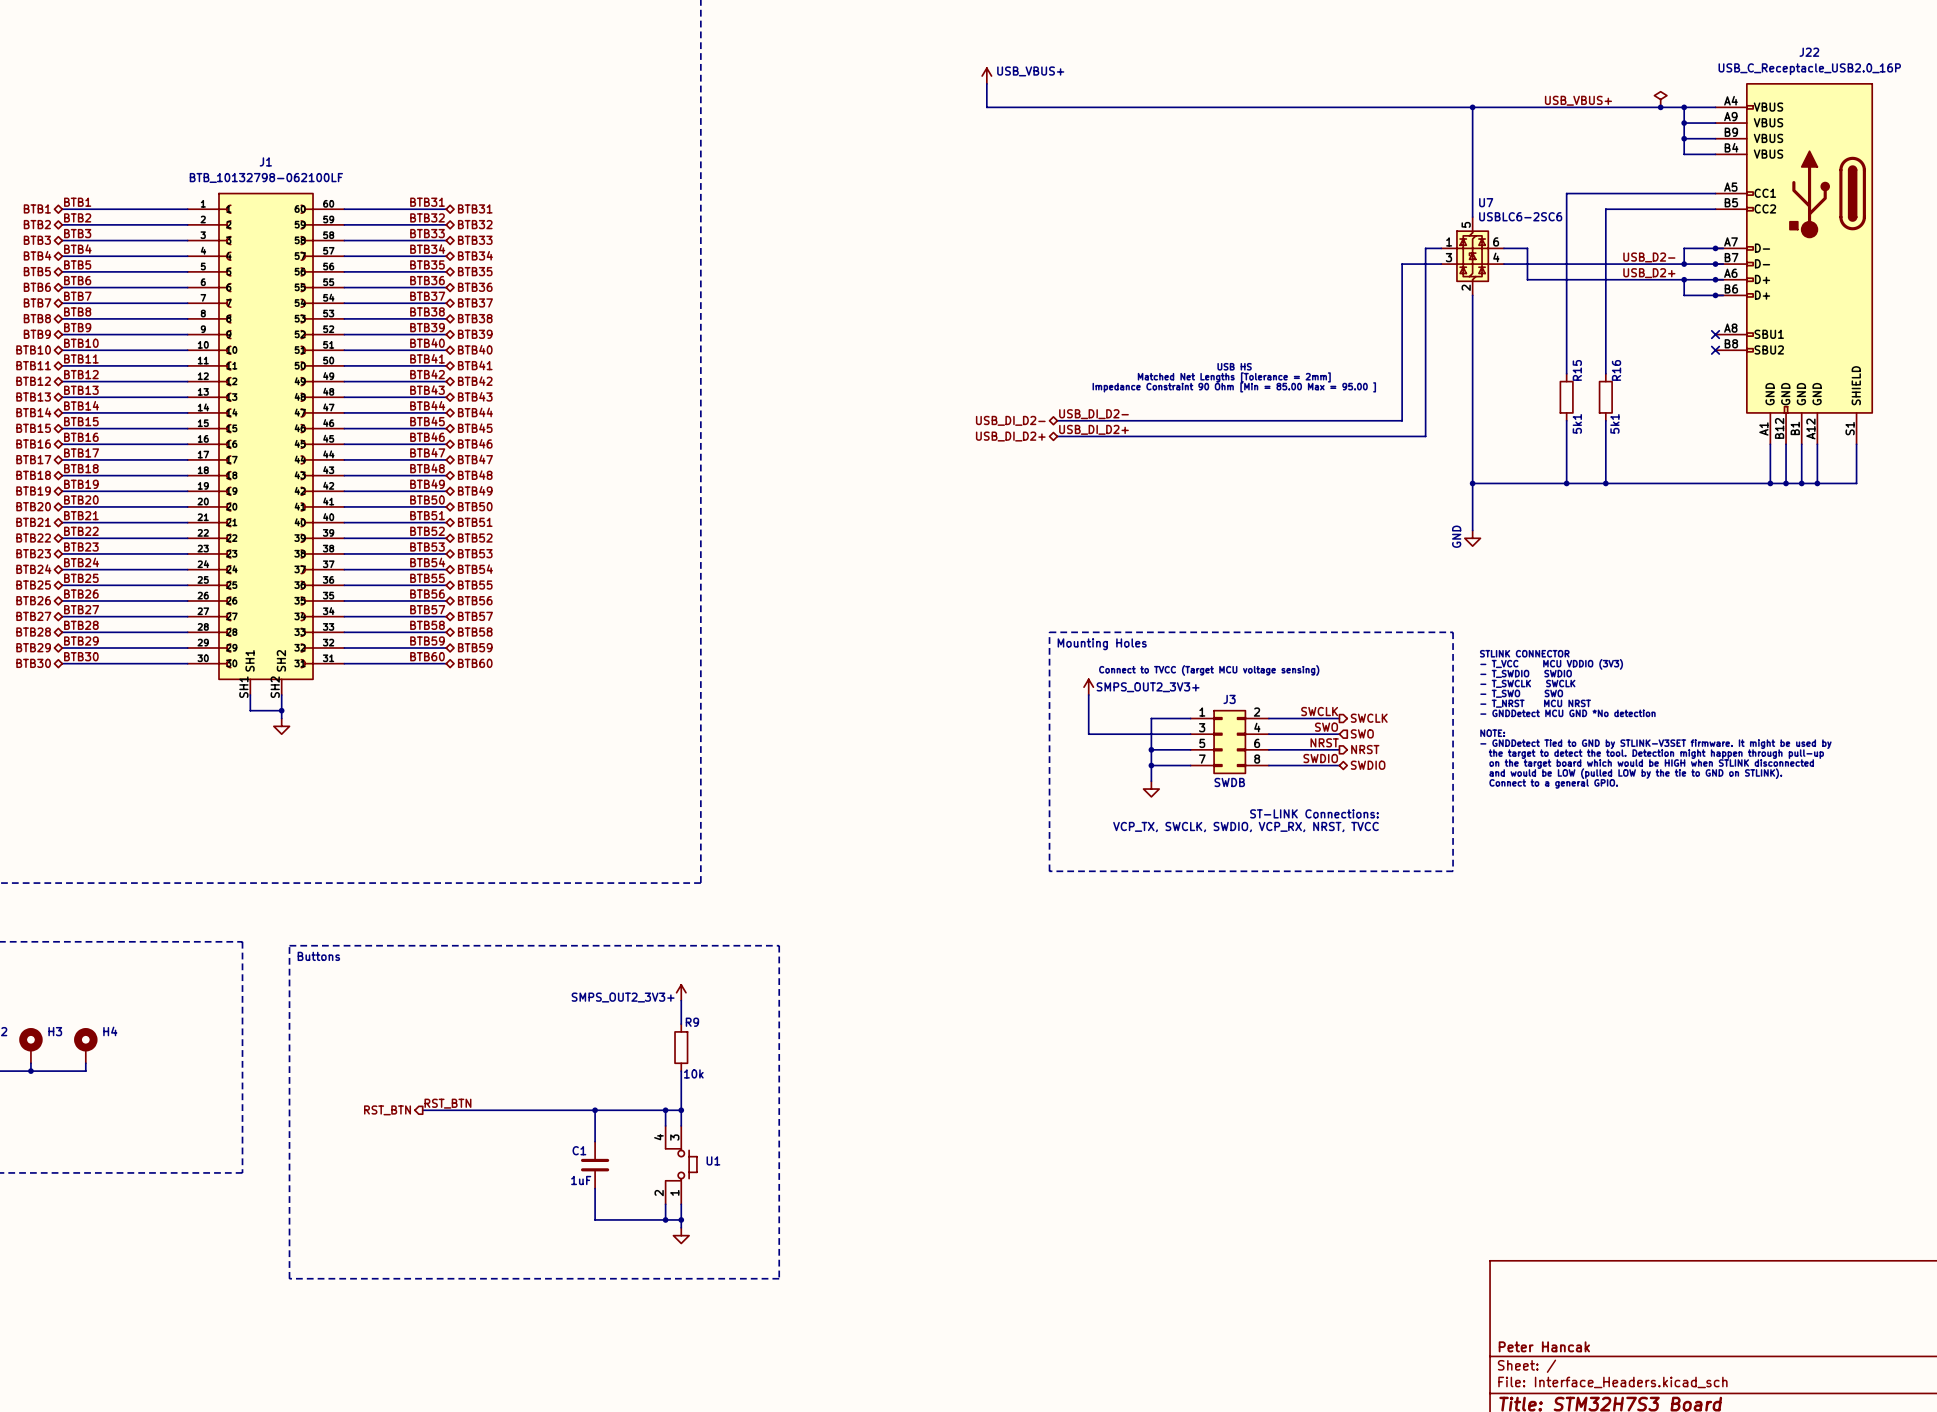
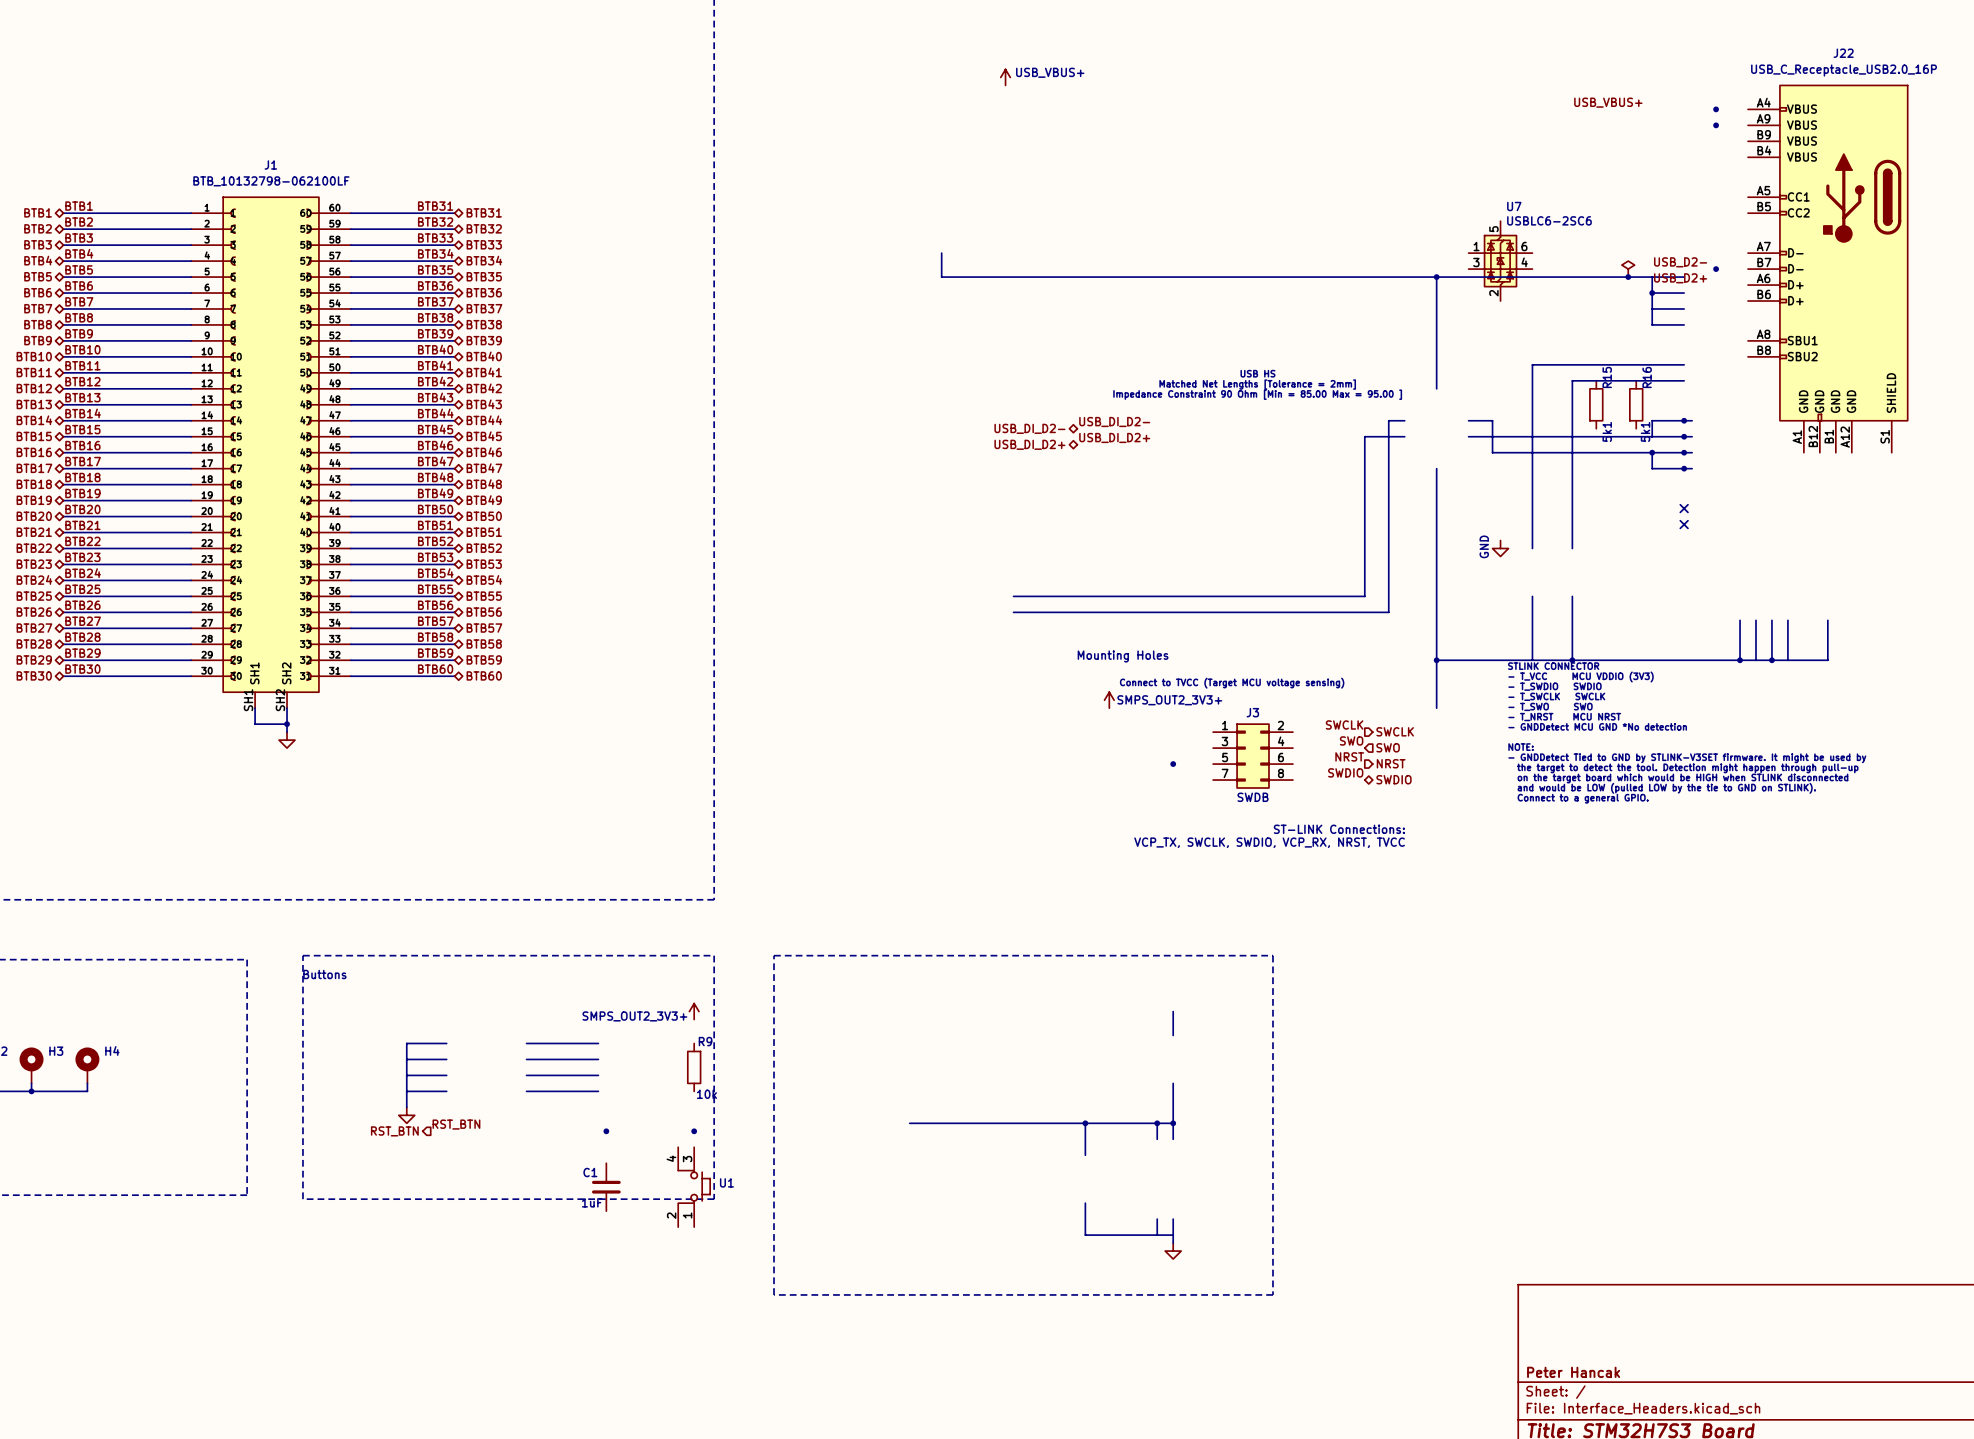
wire: (986, 83) (986, 107) (1715, 107) -> none
power symbol: (1660, 99) -> none
wire: (1472, 107) (1472, 217) -> none
junction: (1472, 107) -> none
junction: (1660, 107) -> none
wire: (1684, 107) (1684, 154) (1715, 154) -> none
wire: (1684, 123) (1715, 123) -> none
wire: (1684, 138) (1715, 138) -> none
junction: (1684, 138) -> none
wire: (1715, 193) (1566, 193) (1566, 373) -> none
wire: (1715, 209) (1605, 209) (1605, 373) -> none
wire: none -> (941, 253) (941, 277) (1684, 277)
wire: (1441, 248) (1425, 248) (1425, 436) (1057, 436) -> none
wire: (1503, 248) (1527, 248) (1527, 279) (1723, 279) -> none
junction: (1715, 248) -> none
wire: (1723, 248) (1684, 248) (1684, 264) -> none
wire: (1441, 264) (1402, 264) (1402, 420) (1057, 420) -> none
wire: (1503, 264) (1723, 264) -> none
power symbol: none -> (1628, 269)
junction: (1715, 264) -> none
wire: none -> (1436, 277) (1436, 388)
junction: none -> (1436, 277)
junction: none -> (1628, 277)
wire: none -> (1652, 277) (1652, 324) (1684, 324)
wire: (1684, 279) (1684, 295) (1723, 295) -> none
junction: (1684, 279) -> none
junction: (1715, 279) -> none
wire: none -> (1652, 293) (1684, 293)
junction: none -> (1652, 293)
wire: (1472, 295) (1472, 530) -> none
junction: (1715, 295) -> none
wire: none -> (1652, 308) (1684, 308)
no-connect mark: (1715, 334) -> none
no-connect mark: (1715, 350) -> none
wire: none -> (1684, 364) (1532, 364) (1532, 548)
wire: none -> (1684, 380) (1572, 380) (1572, 548)
wire: none -> (1404, 420) (1388, 420) (1388, 612) (1013, 612)
wire: none -> (1468, 420) (1492, 420) (1492, 452) (1692, 452)
junction: none -> (1684, 420)
wire: none -> (1692, 420) (1652, 420) (1652, 436)
wire: (1566, 420) (1566, 483) -> none
wire: (1605, 420) (1605, 483) -> none
wire: none -> (1404, 436) (1364, 436) (1364, 596) (1013, 596)
wire: none -> (1468, 436) (1692, 436)
junction: none -> (1684, 436)
wire: none -> (1652, 452) (1652, 468) (1692, 468)
junction: none -> (1652, 452)
junction: none -> (1684, 452)
wire: (1770, 444) (1770, 483) -> none
wire: (1786, 444) (1786, 483) -> none
wire: (1801, 444) (1801, 483) -> none
wire: (1817, 444) (1817, 483) -> none
wire: (1856, 444) (1856, 483) (1472, 483) -> none
wire: none -> (1436, 468) (1436, 708)
junction: none -> (1684, 468)
junction: (1472, 483) -> none
junction: (1566, 483) -> none
junction: (1605, 483) -> none
junction: (1770, 483) -> none
junction: (1786, 483) -> none
junction: (1801, 483) -> none
junction: (1817, 483) -> none
no-connect mark: none -> (1684, 508)
no-connect mark: none -> (1684, 524)
wire: none -> (1532, 596) (1532, 660)
wire: none -> (1572, 596) (1572, 660)
wire: none -> (1740, 620) (1740, 660)
wire: none -> (1756, 620) (1756, 660)
wire: none -> (1771, 620) (1771, 660)
wire: none -> (1787, 620) (1787, 660)
wire: none -> (1827, 620) (1827, 660) (1436, 660)
line: (1049, 632) (1453, 632) (1453, 871) (1049, 871) (1049, 632) -> none
junction: none -> (1436, 660)
junction: none -> (1572, 660)
junction: none -> (1740, 660)
junction: none -> (1771, 660)
wire: (1088, 695) (1088, 734) (1190, 734) -> none
wire: (1190, 718) (1151, 718) (1151, 781) -> none
wire: (1268, 718) (1339, 718) -> none
wire: (1268, 734) (1339, 734) -> none
wire: (1151, 749) (1190, 749) -> none
wire: (1268, 749) (1339, 749) -> none
wire: (1151, 765) (1190, 765) -> none
junction: (1151, 765) -> none
wire: (1268, 765) (1339, 765) -> none
power symbol: (1151, 789) -> none
line: none -> (774, 955) (1272, 955) (1272, 1294) (774, 1294) (774, 955)
line: (289, 945) (779, 945) (779, 1278) (289, 1278) (289, 945) -> (302, 955) (302, 1199) (714, 1199) (714, 955) (302, 955)
wire: none -> (1173, 1011) (1173, 1035)
wire: (681, 1000) (681, 1024) -> none
wire: none -> (446, 1043) (406, 1043) (406, 1107)
wire: none -> (526, 1043) (598, 1043)
wire: none -> (406, 1059) (446, 1059)
wire: none -> (526, 1059) (598, 1059)
wire: none -> (406, 1075) (446, 1075)
wire: none -> (526, 1075) (598, 1075)
wire: none -> (1173, 1083) (1173, 1139)
wire: none -> (406, 1091) (446, 1091)
wire: none -> (526, 1091) (598, 1091)
wire: (681, 1071) (681, 1125) -> none
power symbol: none -> (406, 1115)
wire: none -> (909, 1123) (1173, 1123)
wire: none -> (1085, 1123) (1085, 1155)
junction: none -> (1085, 1123)
wire: none -> (1157, 1123) (1157, 1139)
junction: none -> (1157, 1123)
junction: none -> (1173, 1123)
wire: (422, 1110) (681, 1110) -> none
wire: (595, 1110) (595, 1141) -> none
wire: (665, 1110) (665, 1125) -> none
junction: (665, 1110) -> none
wire: none -> (1085, 1203) (1085, 1235) (1173, 1235)
wire: (595, 1188) (595, 1219) (681, 1219) -> none
wire: none -> (1157, 1219) (1157, 1235)
wire: none -> (1173, 1219) (1173, 1243)
wire: (665, 1204) (665, 1219) -> none
wire: (681, 1204) (681, 1227) -> none
junction: (665, 1219) -> none
junction: (681, 1219) -> none
power symbol: none -> (1173, 1251)
power symbol: (681, 1235) -> none

